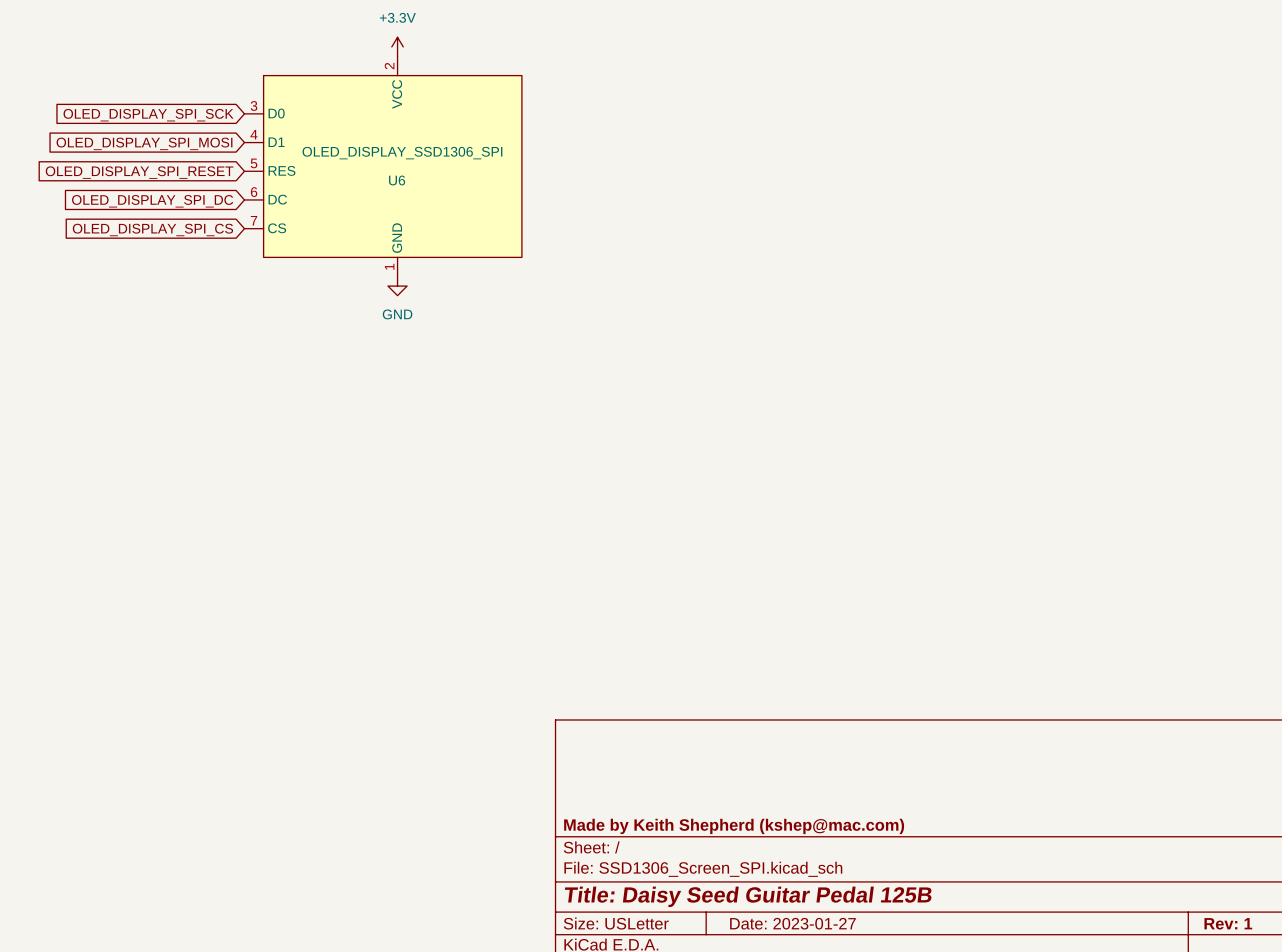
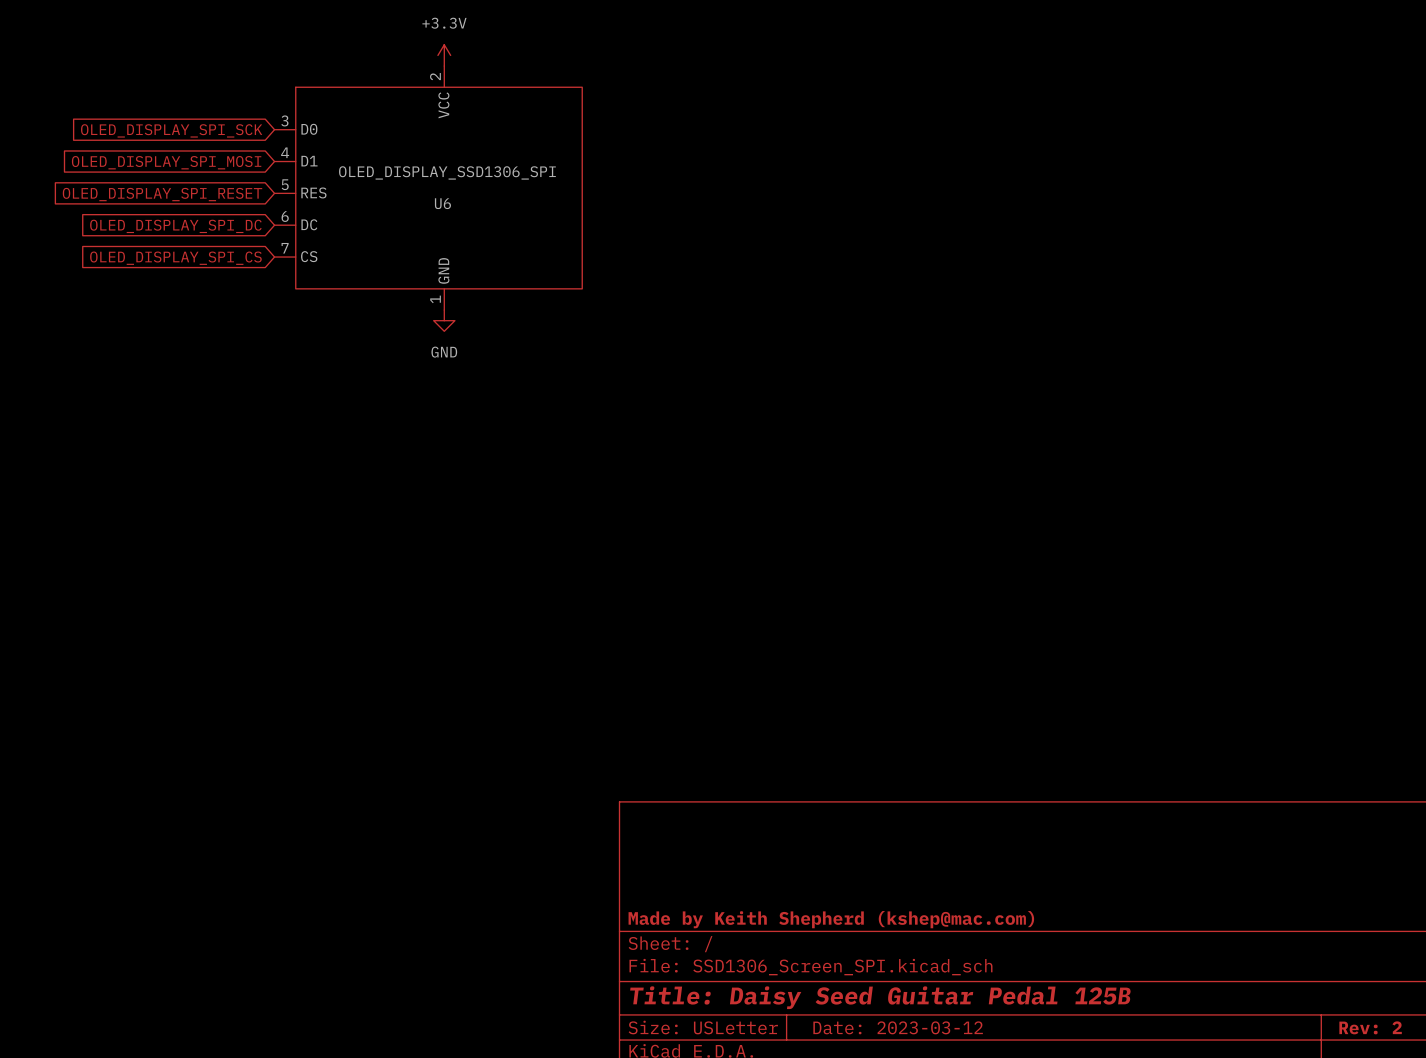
title block: Date: 2023-01-27 (792, 923) -> Date: 2023-03-12 (898, 1027)
title block: Rev: 1 (1228, 923) -> Rev: 2 (1370, 1027)

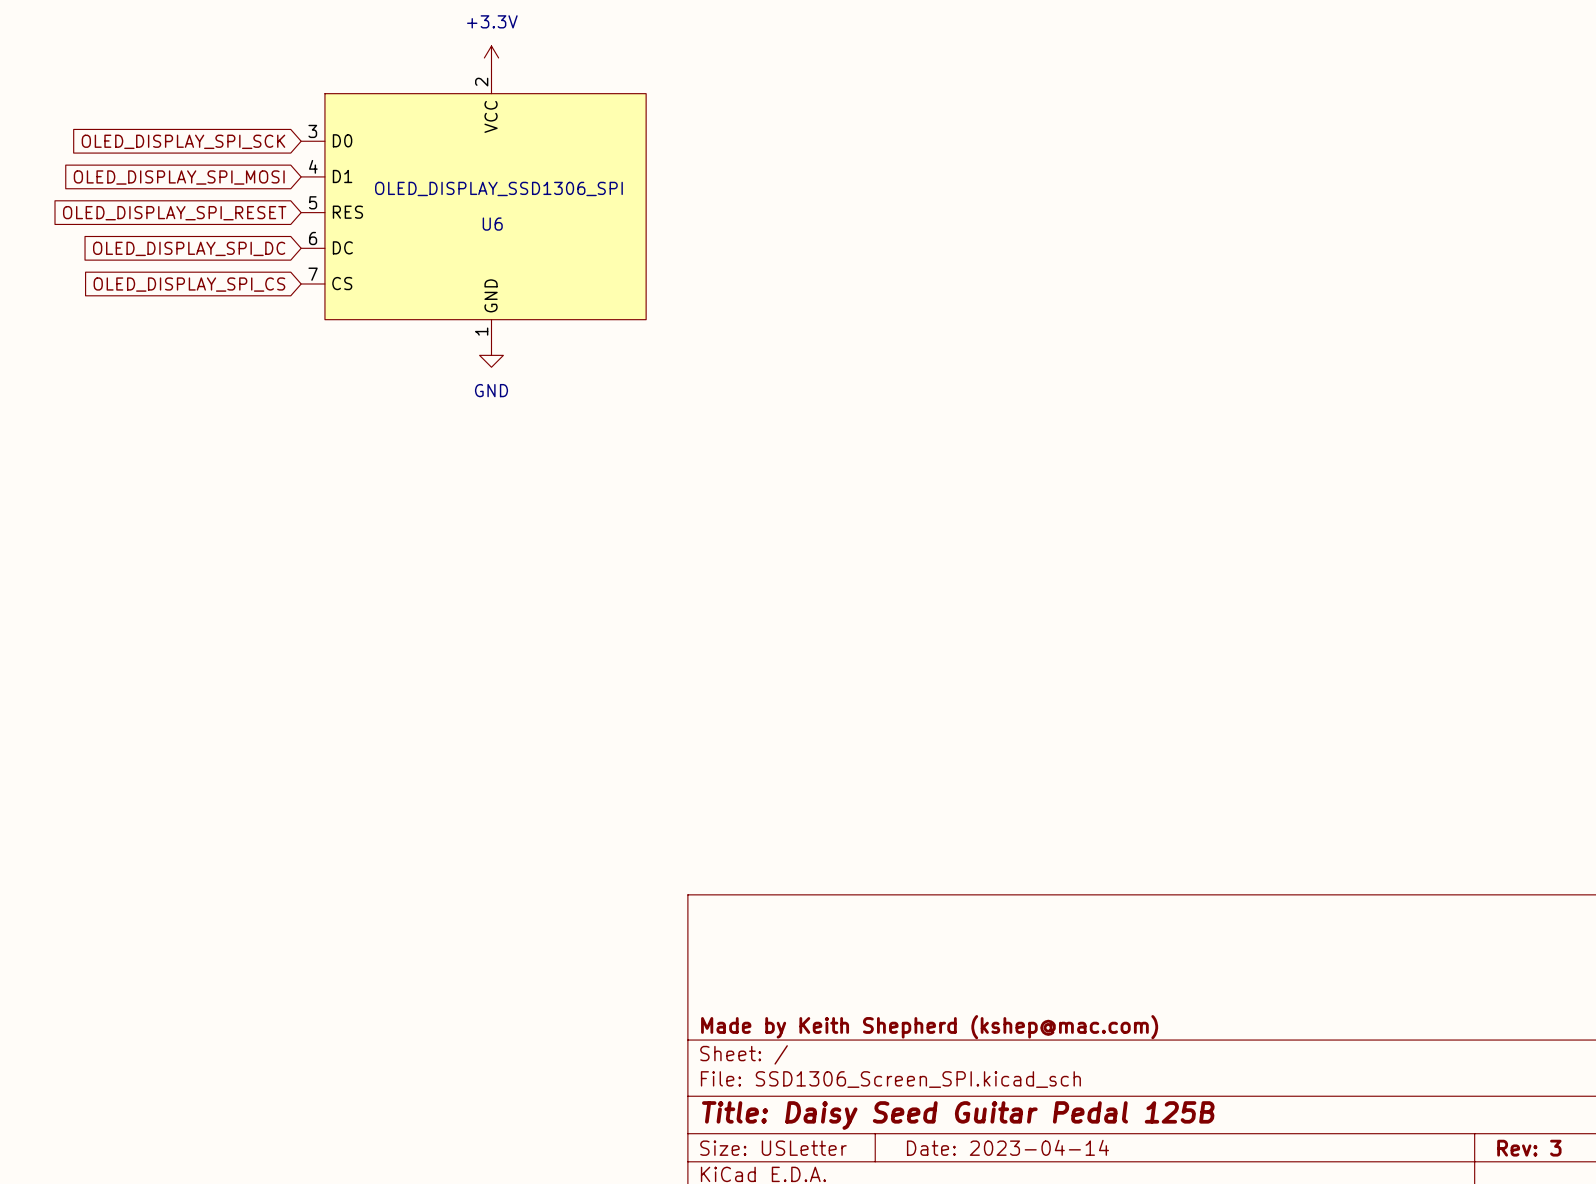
title block: Date: 2023-03-12 (898, 1027) -> Date: 2023-04-14 (1007, 1147)
title block: Rev: 2 (1370, 1027) -> Rev: 3 (1529, 1148)

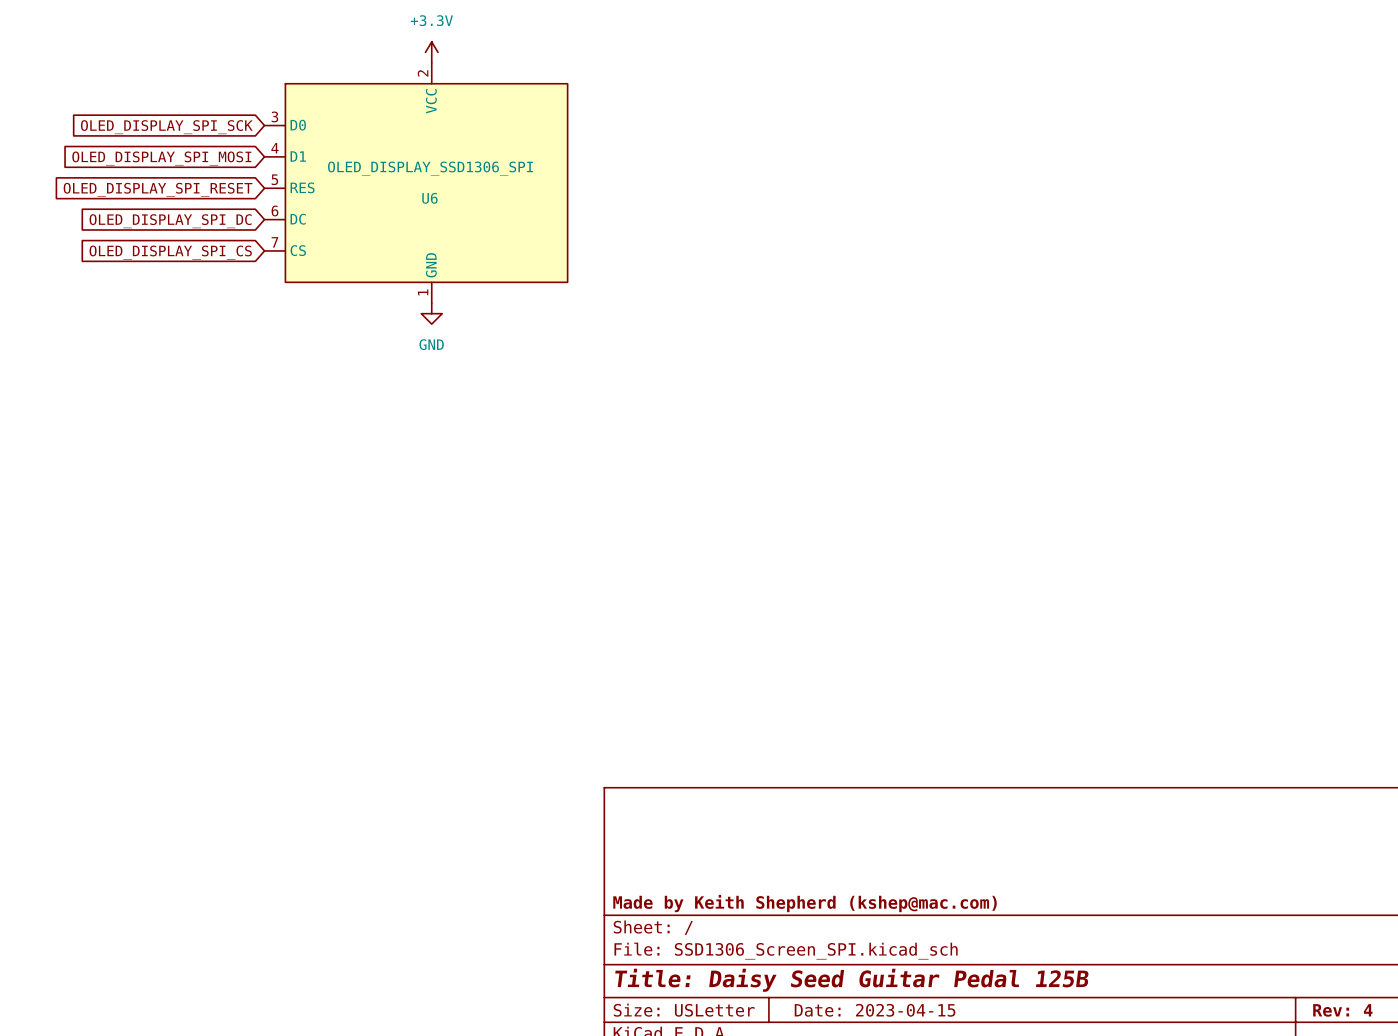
title block: Date: 2023-04-14 (1007, 1147) -> Date: 2023-04-15 (875, 1010)
title block: Rev: 3 (1529, 1148) -> Rev: 4 (1342, 1010)

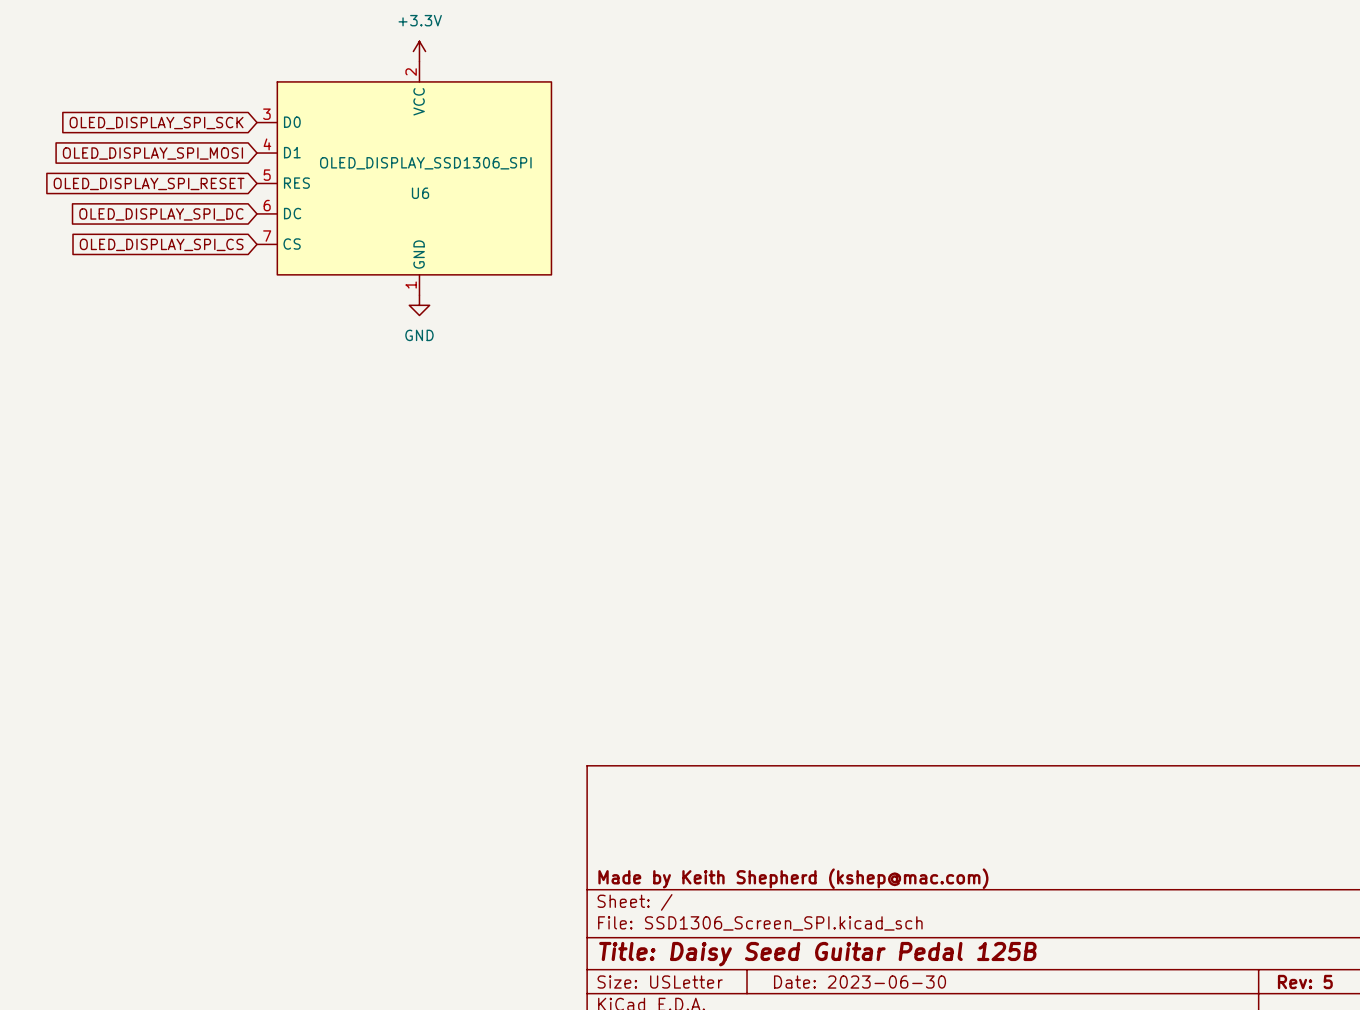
title block: Date: 2023-04-15 (875, 1010) -> Date: 2023-06-30 (860, 982)
title block: Rev: 4 (1342, 1010) -> Rev: 5 (1305, 982)

